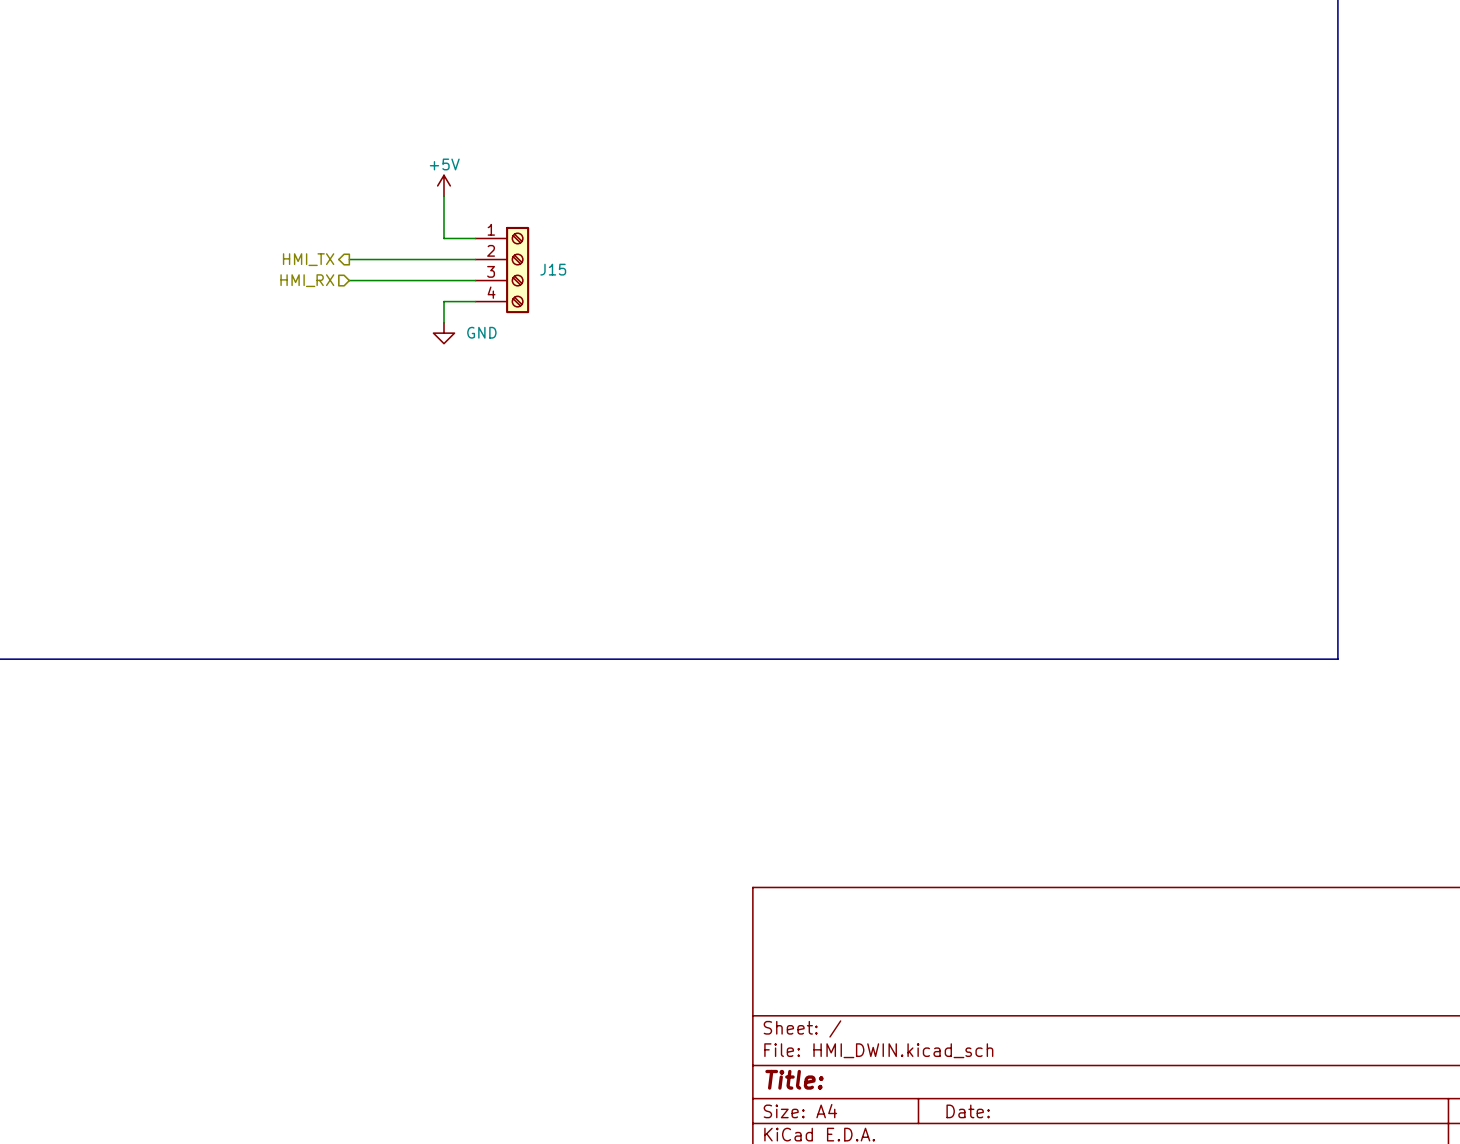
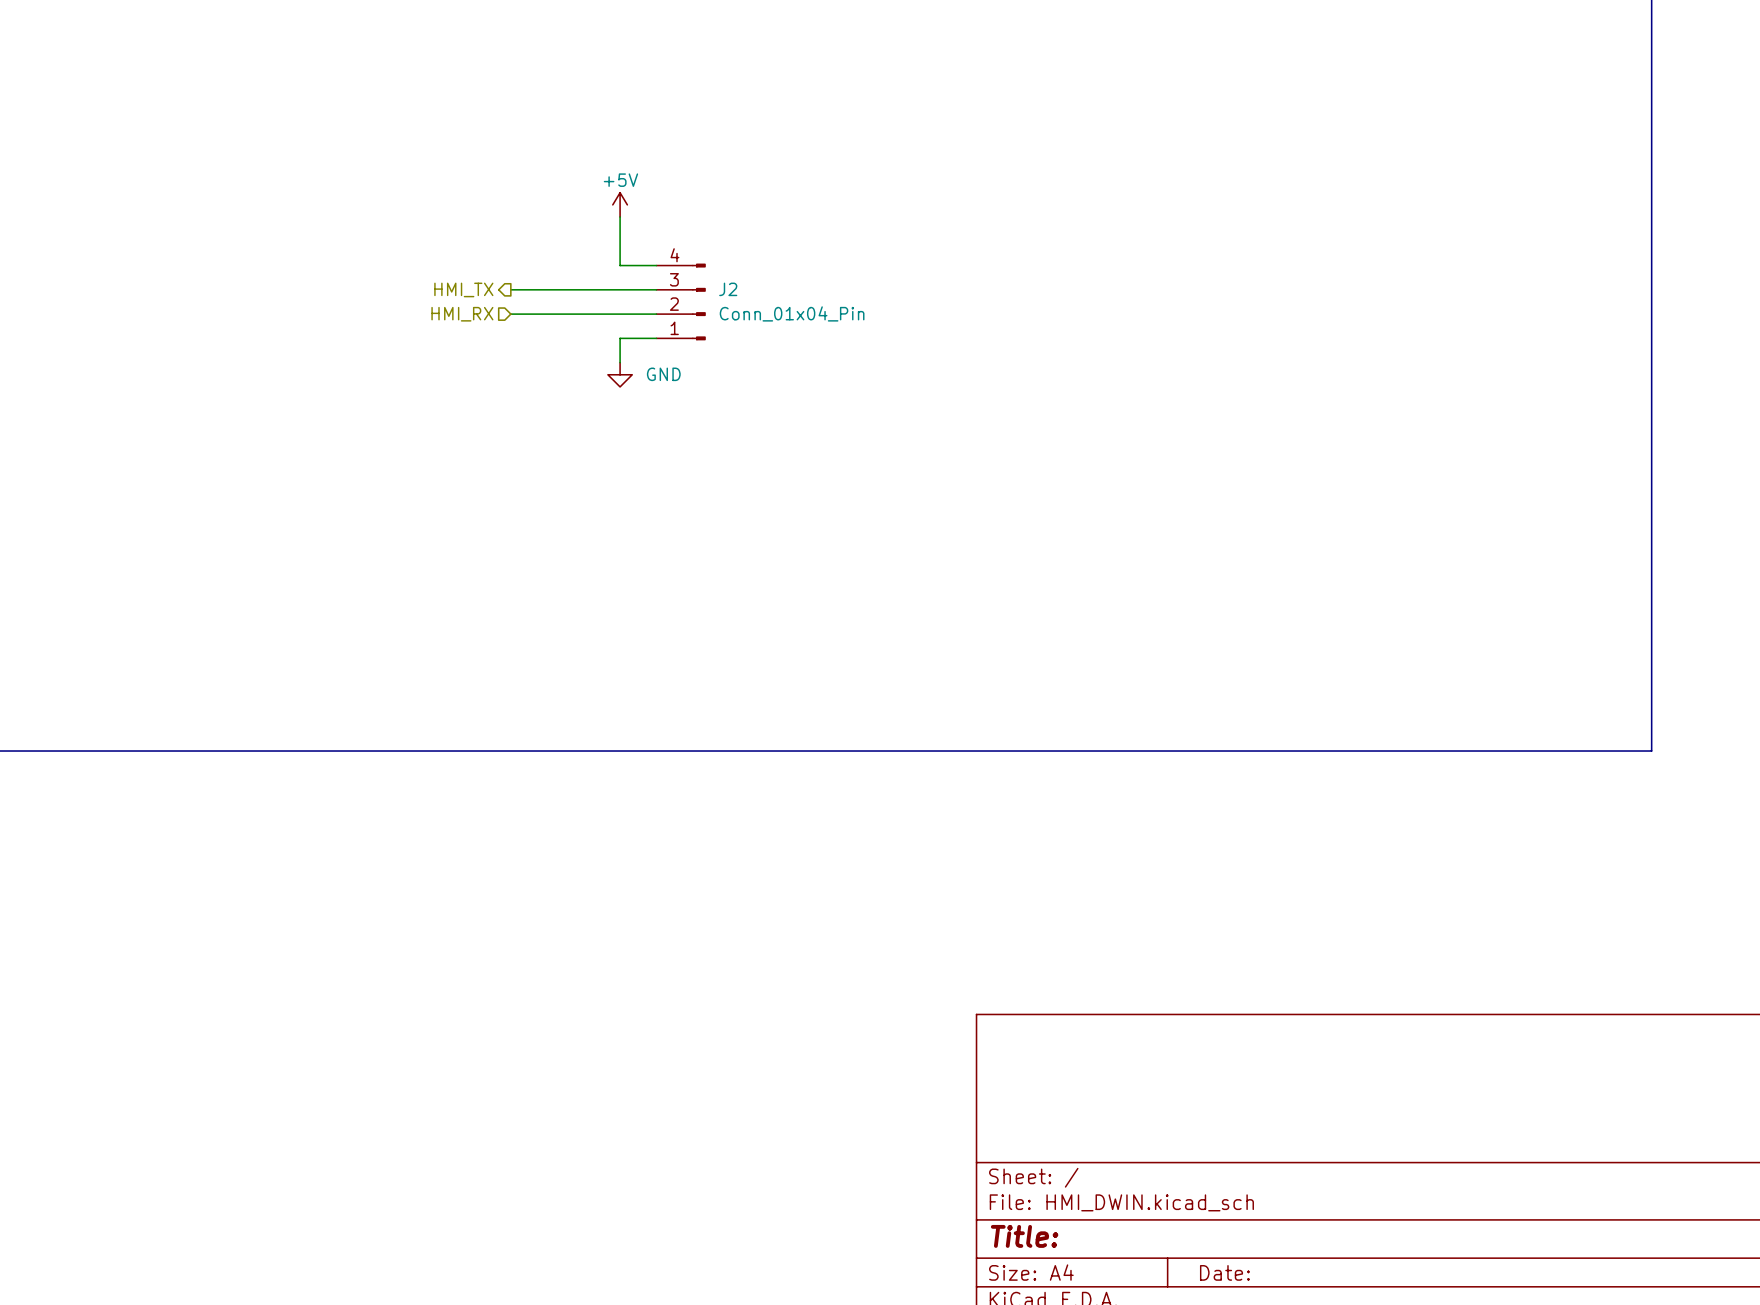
J2: none -> Conn_01x04_Pin (681, 301)
J15: (502, 270) -> none

